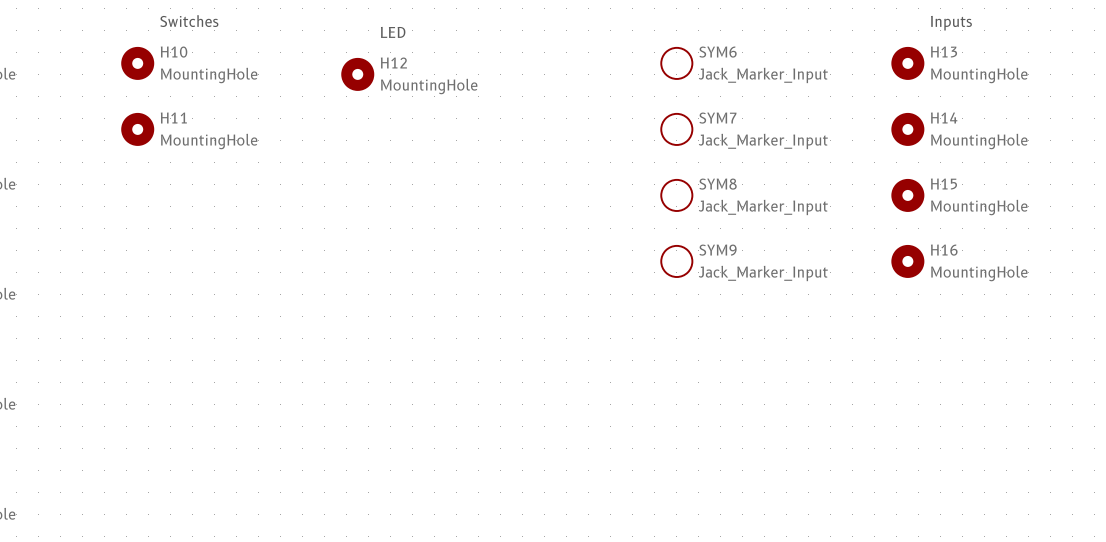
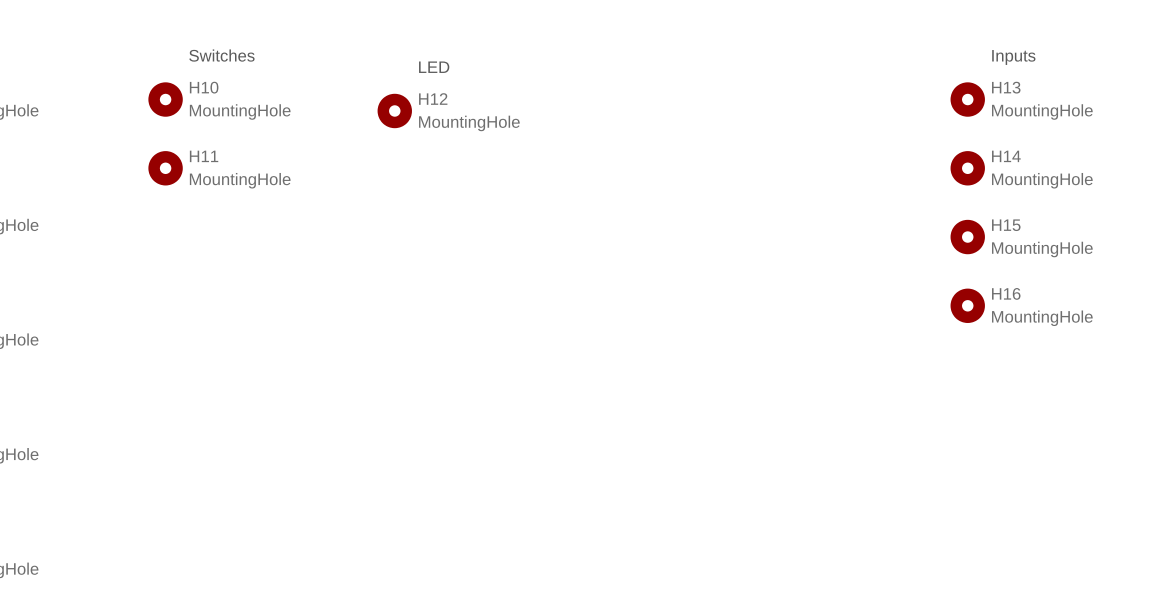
SYM6: Jack_Marker_Input (676, 63) -> none
SYM7: Jack_Marker_Input (676, 129) -> none
SYM8: Jack_Marker_Input (676, 195) -> none
SYM9: Jack_Marker_Input (676, 261) -> none

